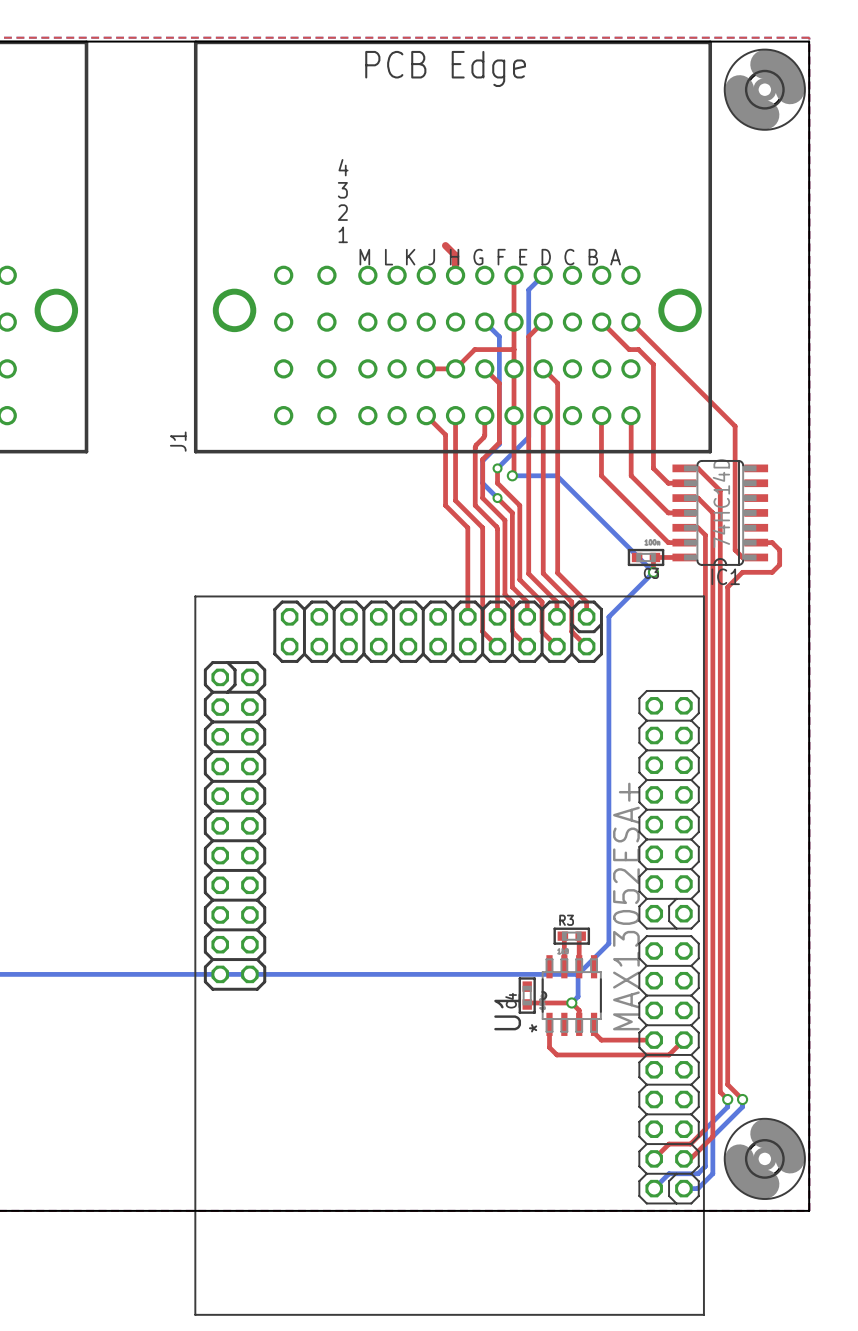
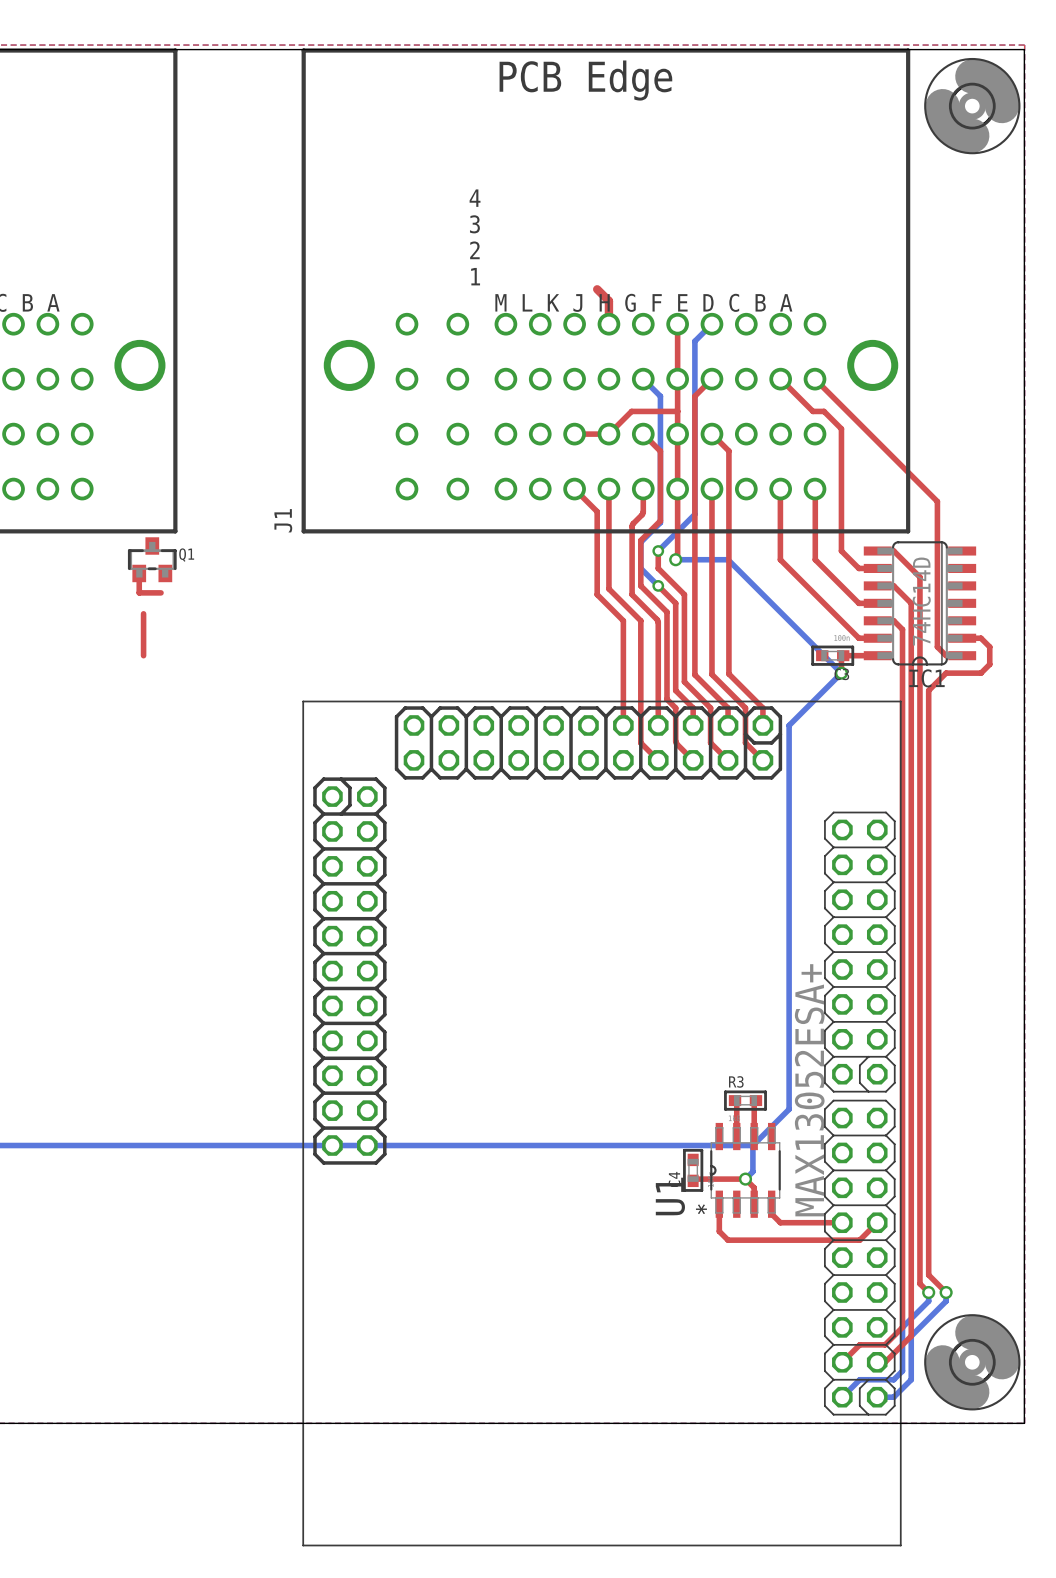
Q1: none -> (152, 559)
top track: none -> (139, 573) (139, 592) (161, 592)
top track: none -> (143, 613) (143, 655)

